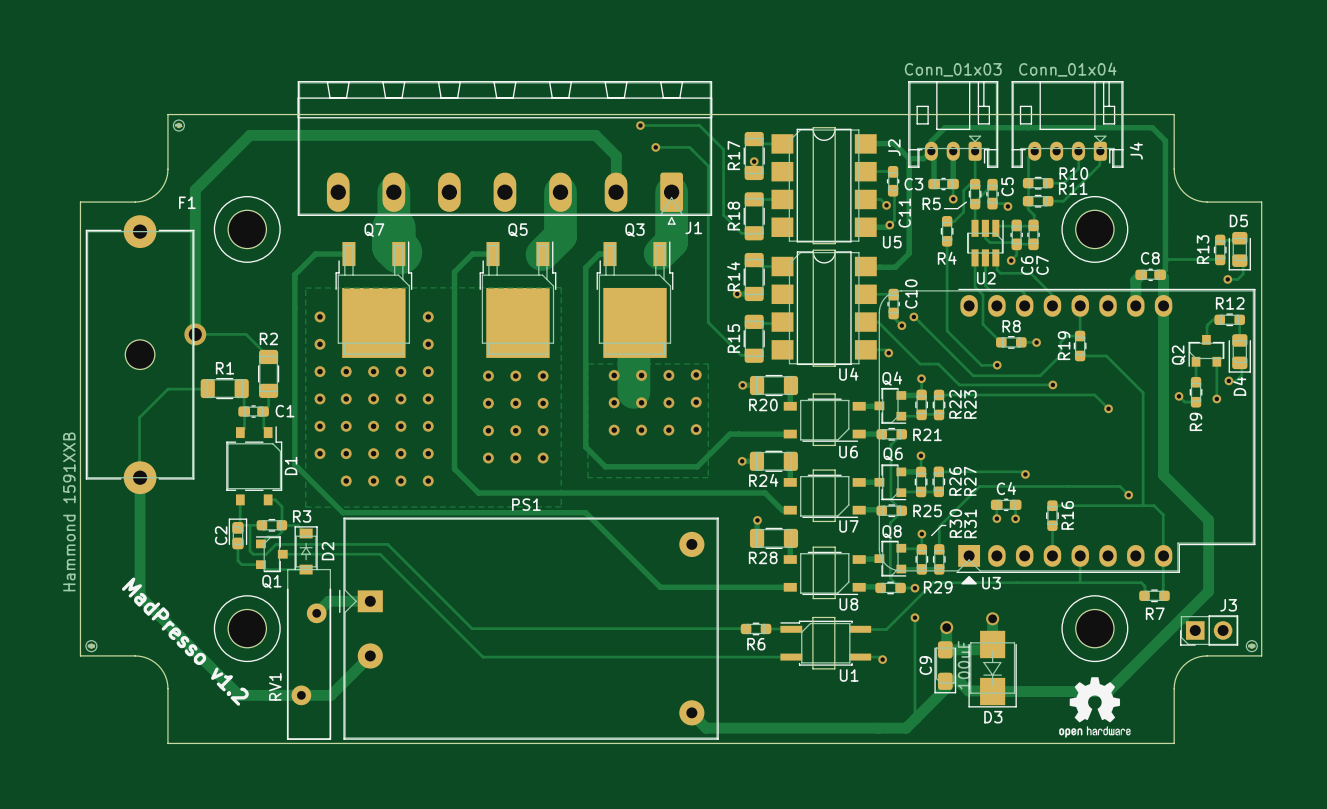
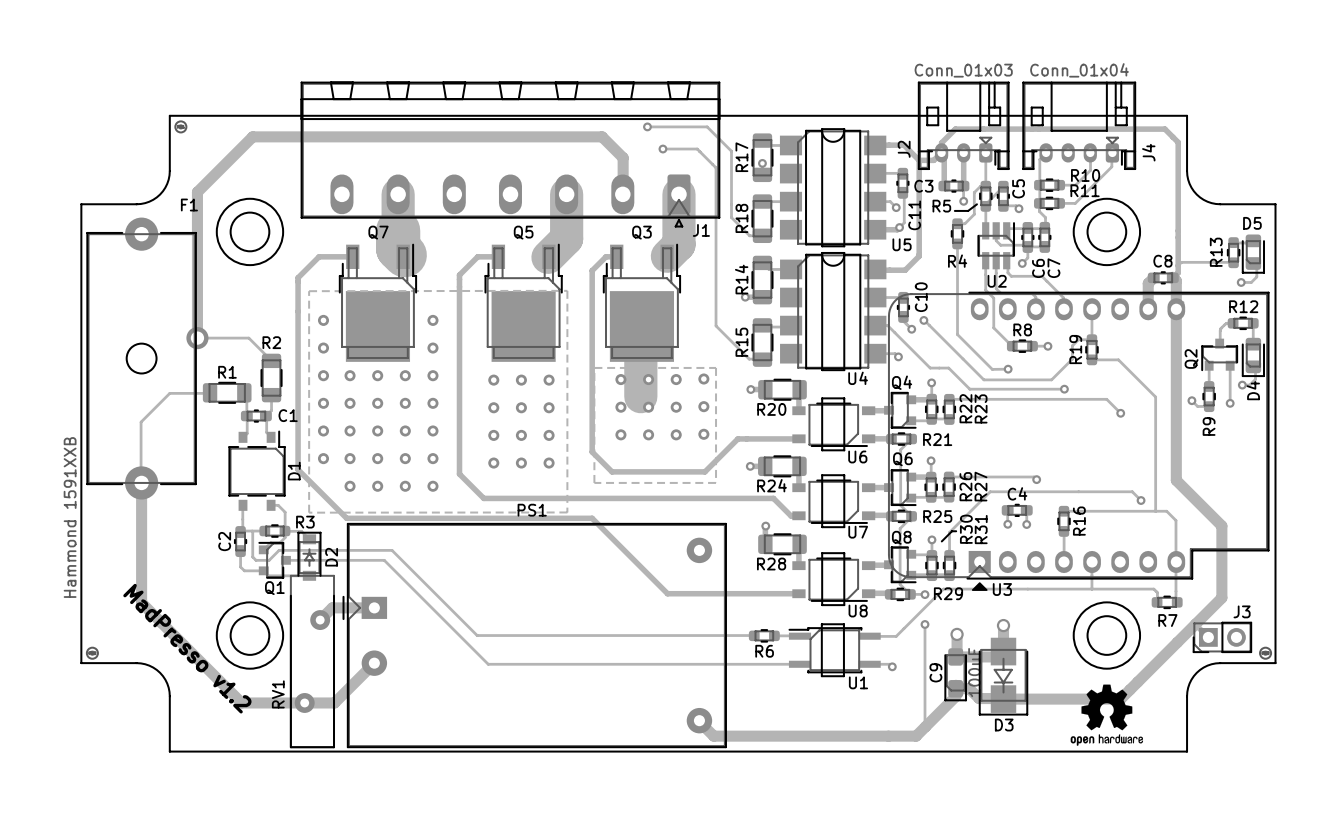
C2 footprint: [228, 518, 248, 550] -> [234, 526, 247, 558]

